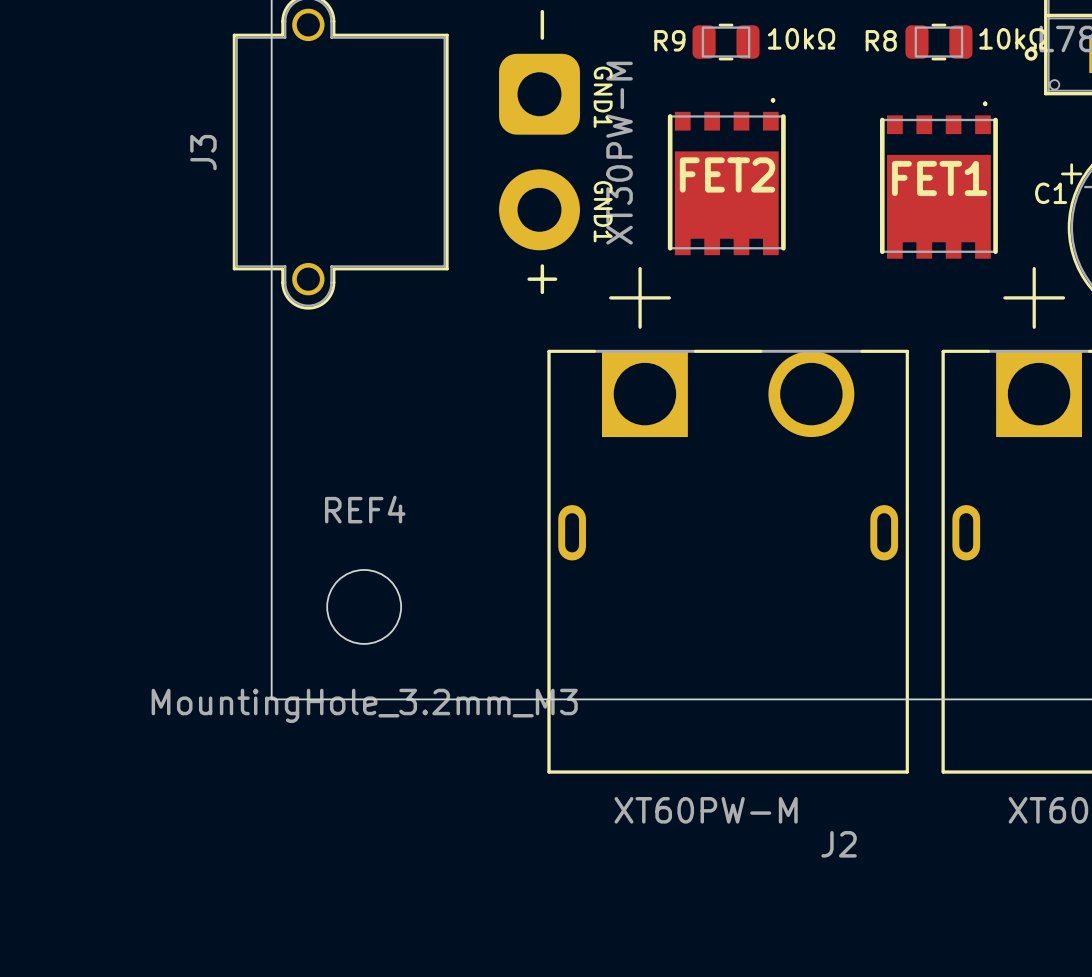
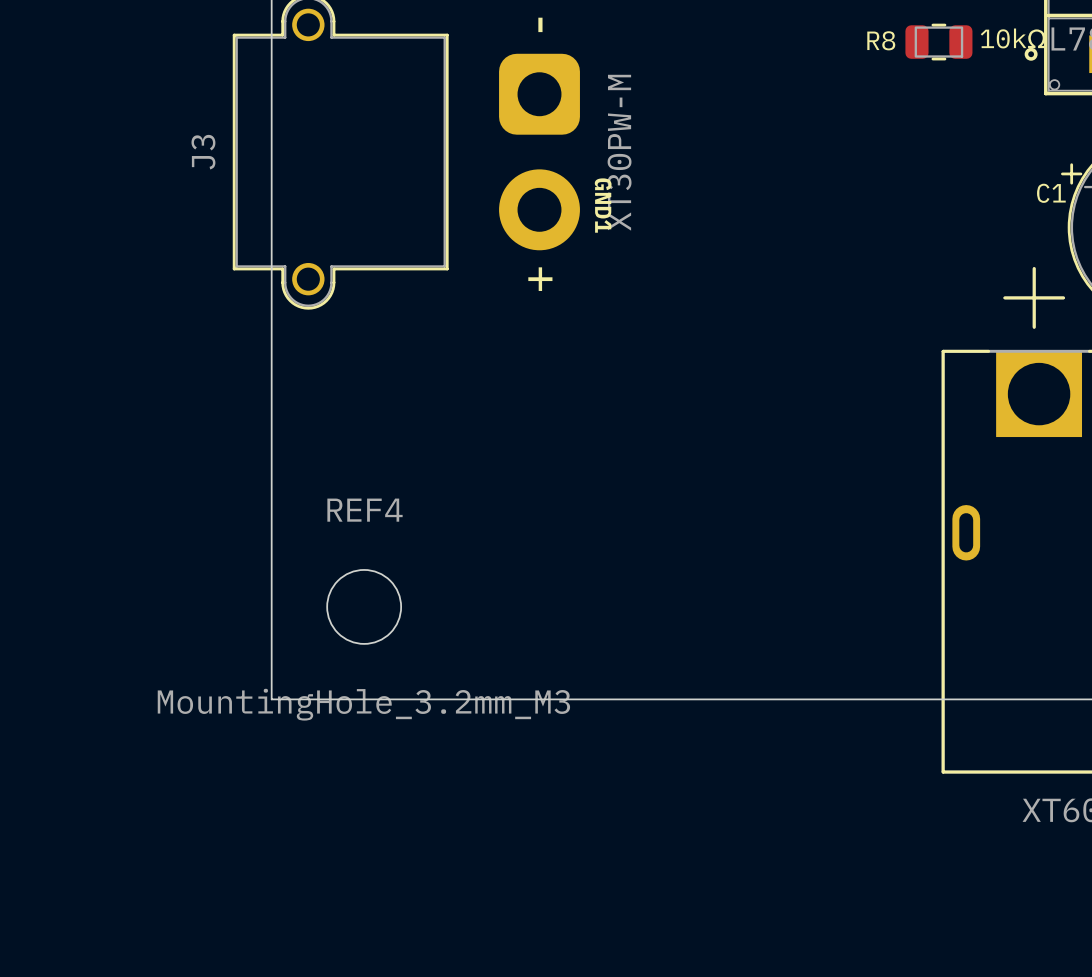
R9: 10kΩ (726, 42) -> none
text: GND1 (603, 97) -> none
FET2: (726, 176) -> none
FET1: (938, 180) -> none
J2: XT60PW-M (728, 520) -> none

